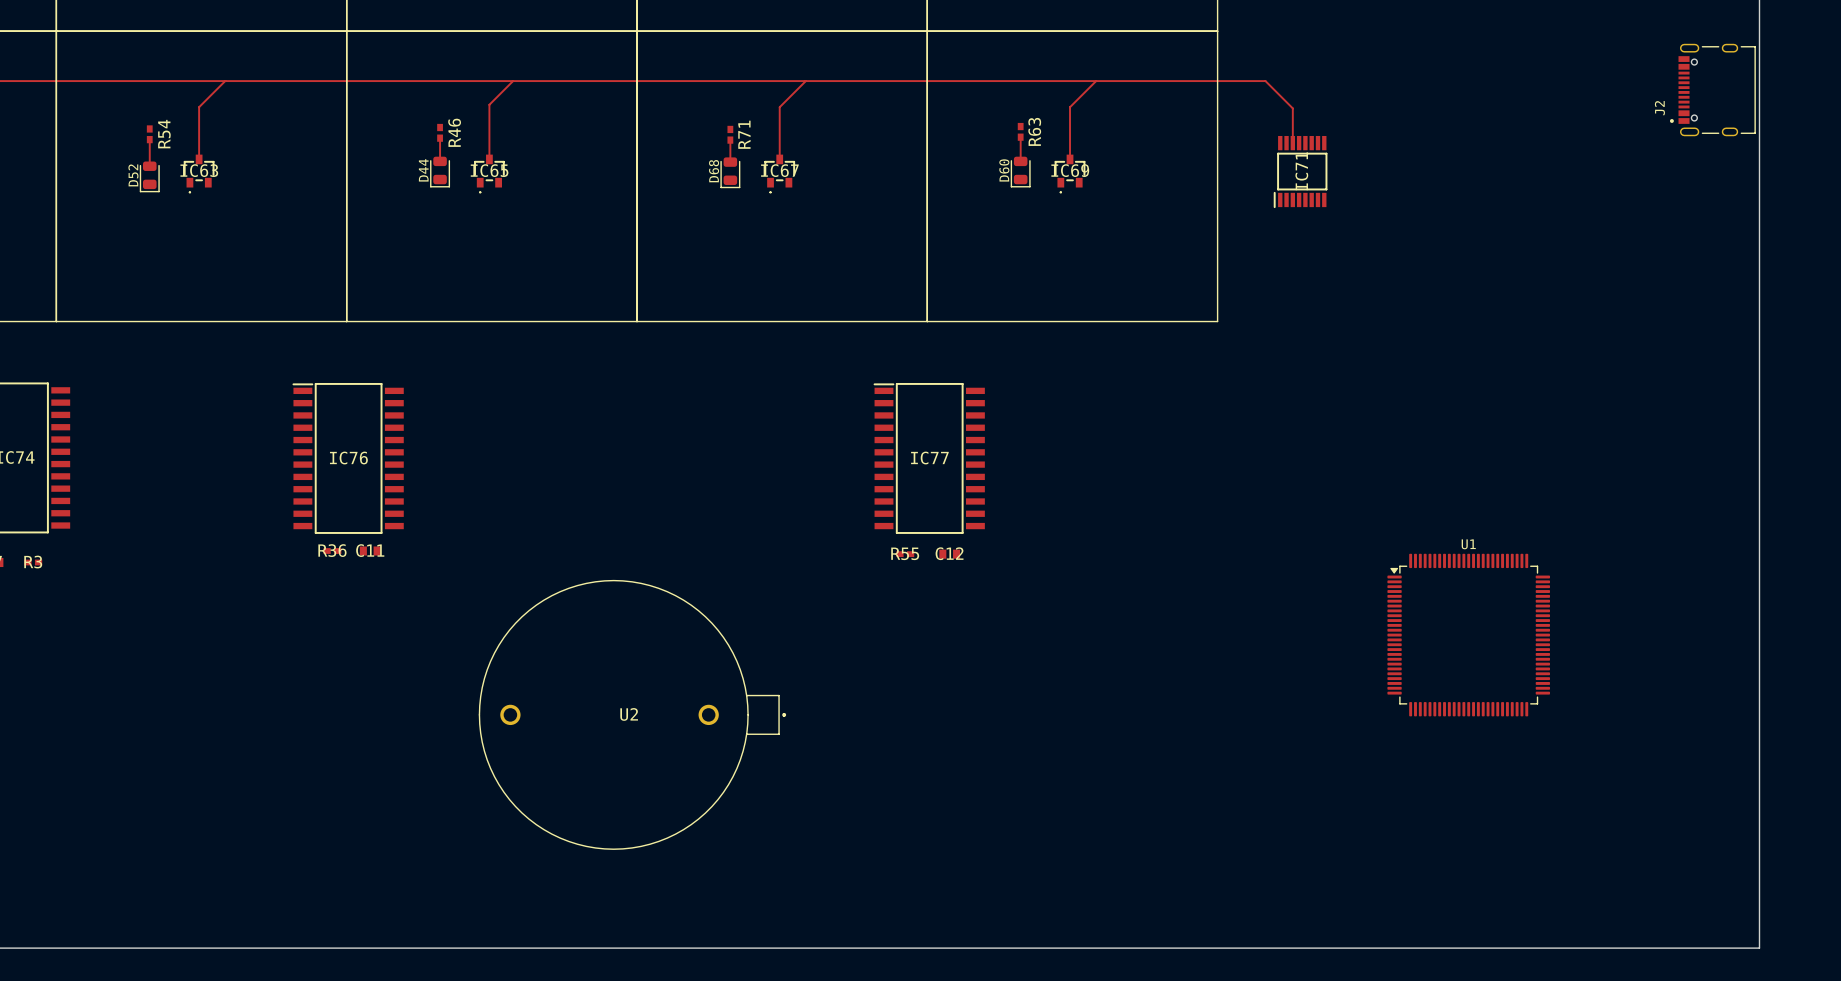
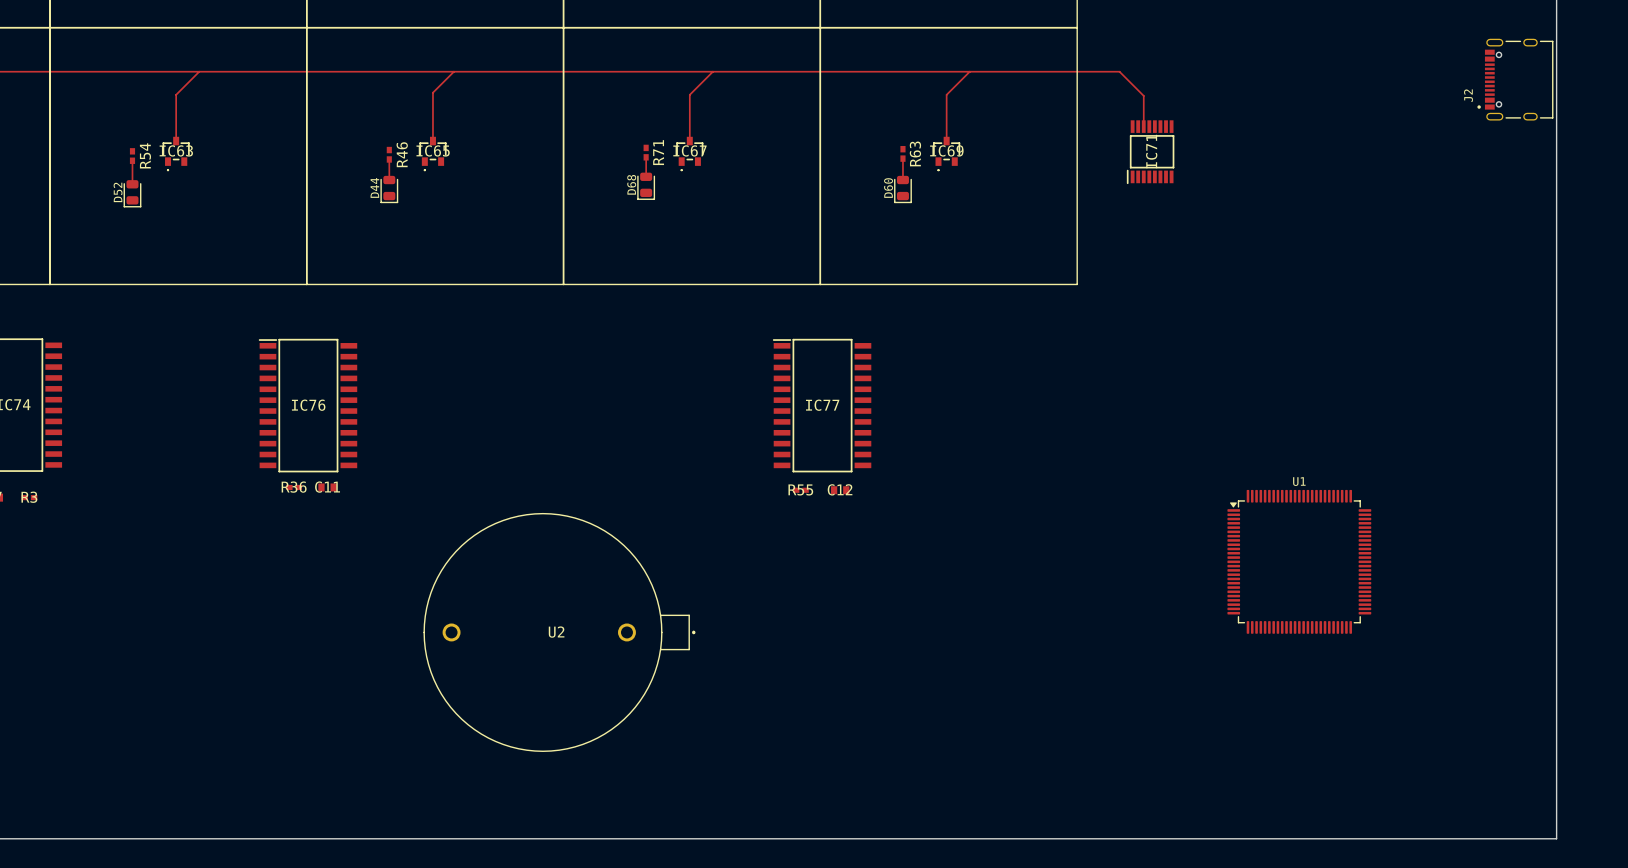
R63 position: (1020, 131) -> (902, 153)
R46 position: (440, 132) -> (389, 154)
R54 position: (149, 134) -> (132, 156)
R71 position: (730, 134) -> (646, 152)
track: (1020, 137) (1020, 161) -> (902, 158) (902, 180)
track: (440, 138) (440, 161) -> (389, 159) (389, 180)
track: (149, 139) (149, 166) -> (132, 160) (132, 184)
track: (730, 140) (730, 162) -> (646, 157) (646, 176)
D44 position: (440, 172) -> (389, 189)
D68 position: (730, 172) -> (646, 186)
D60 position: (1020, 172) -> (902, 189)
D52 position: (149, 176) -> (132, 193)

